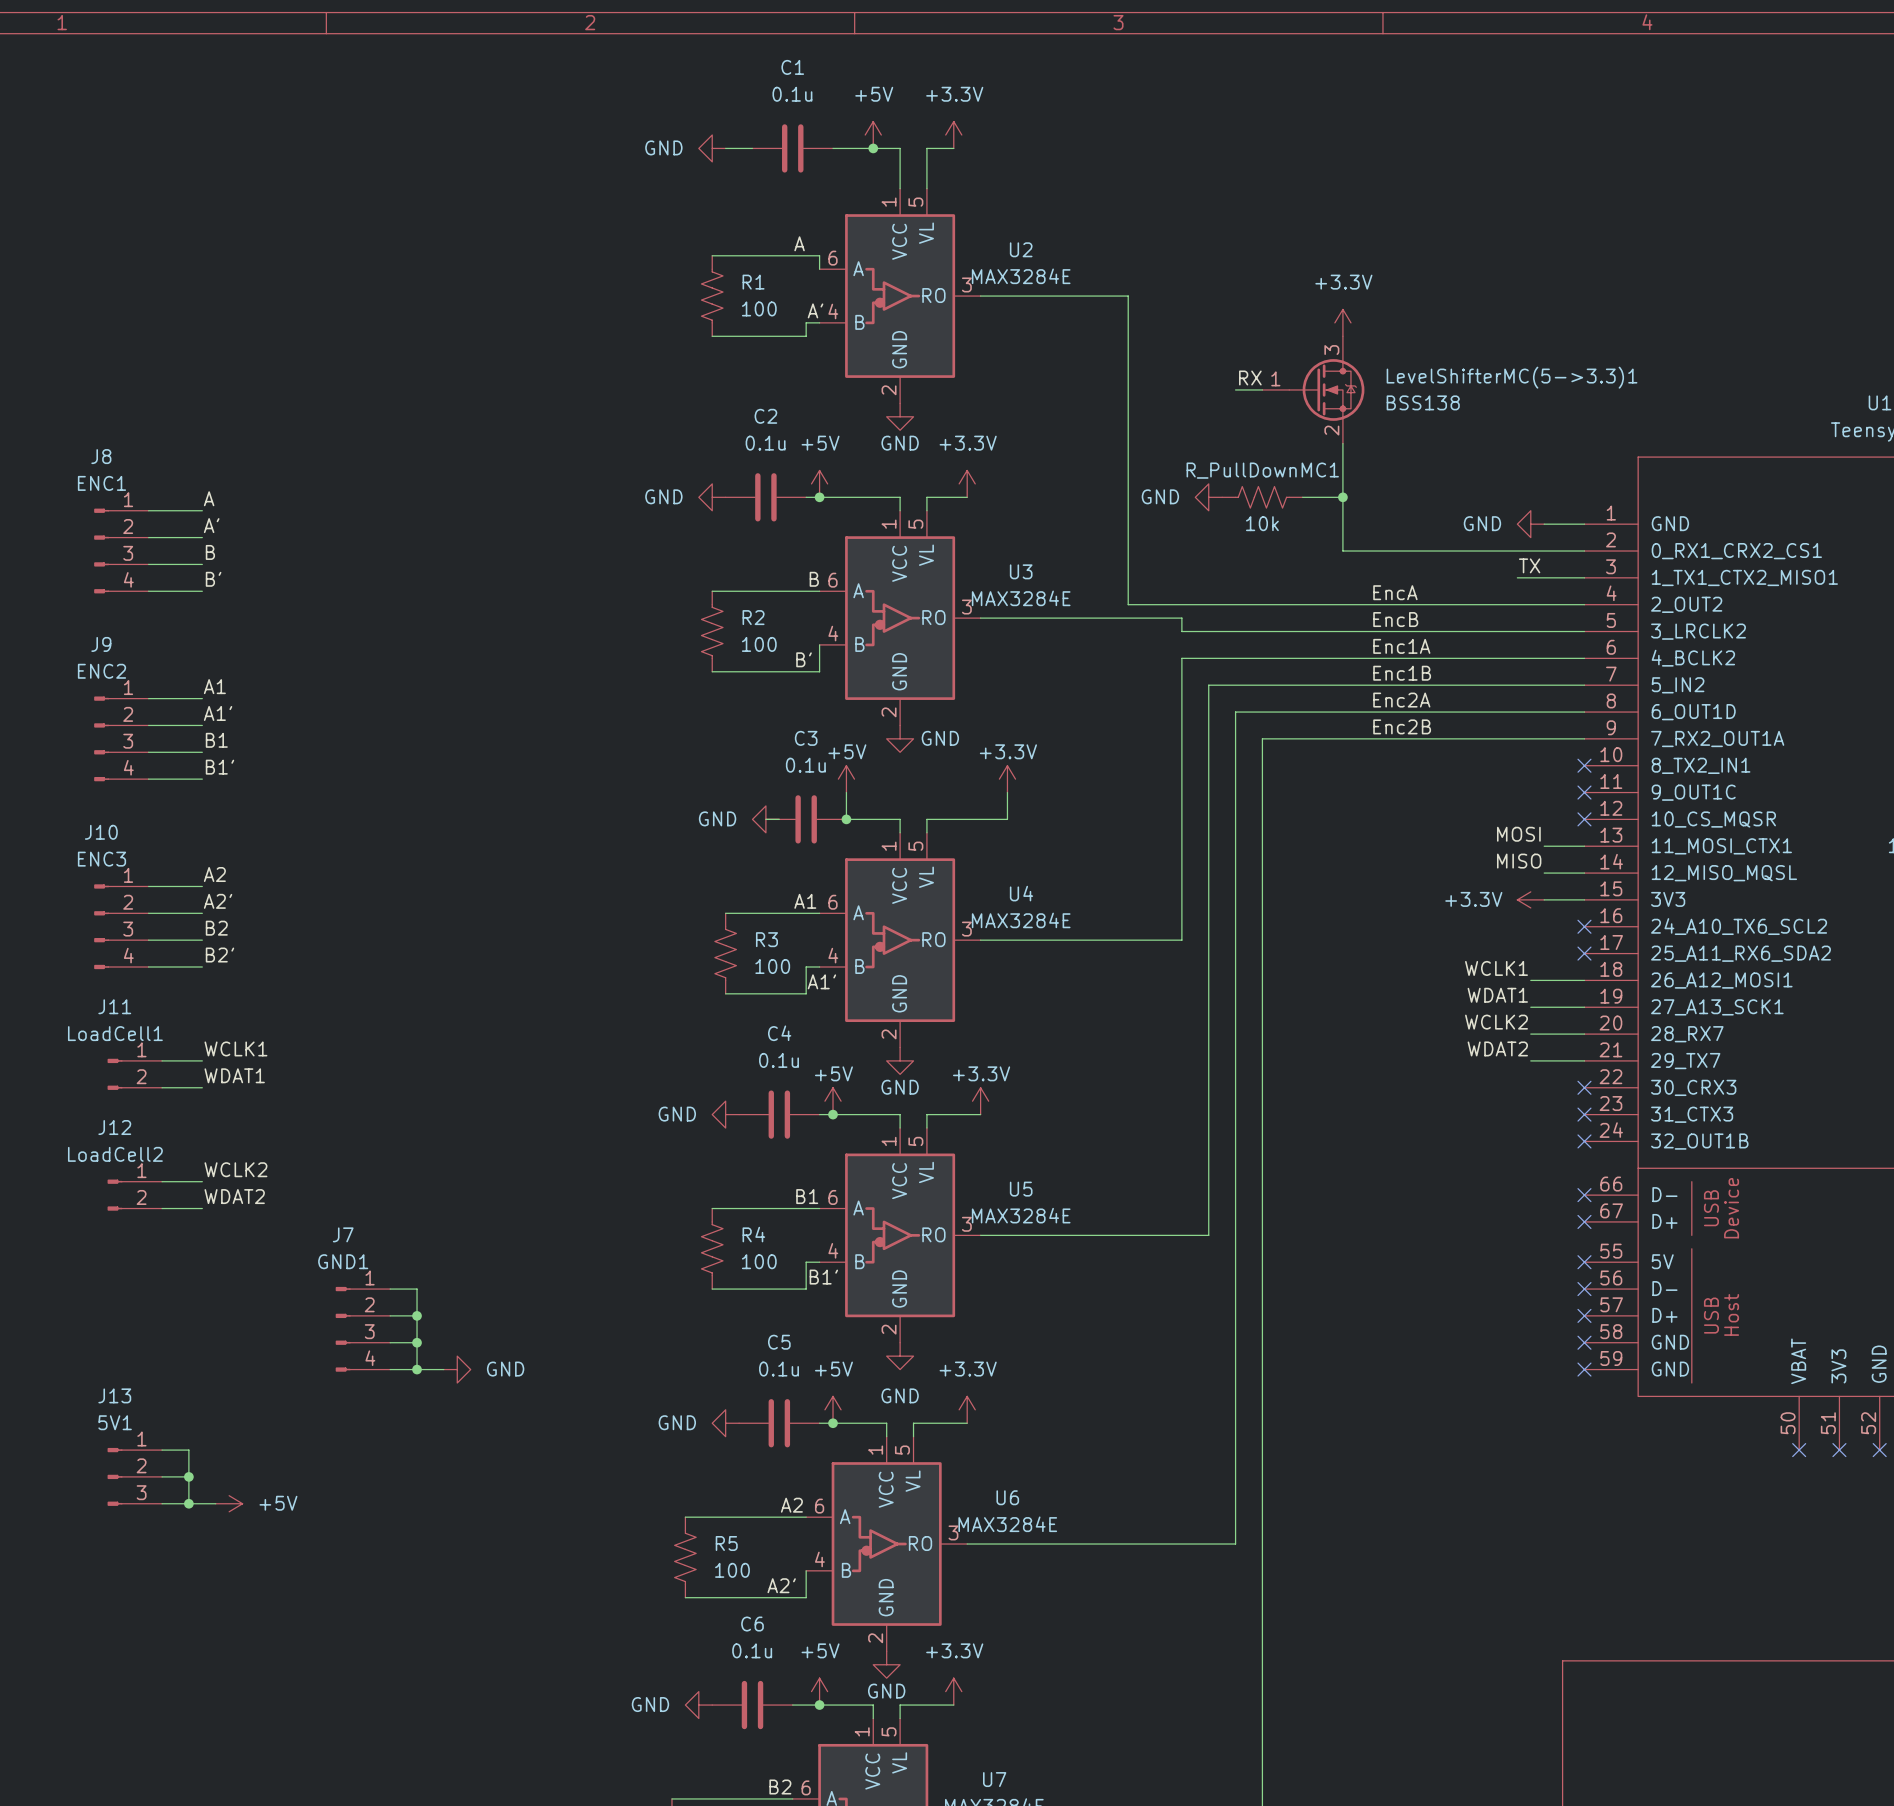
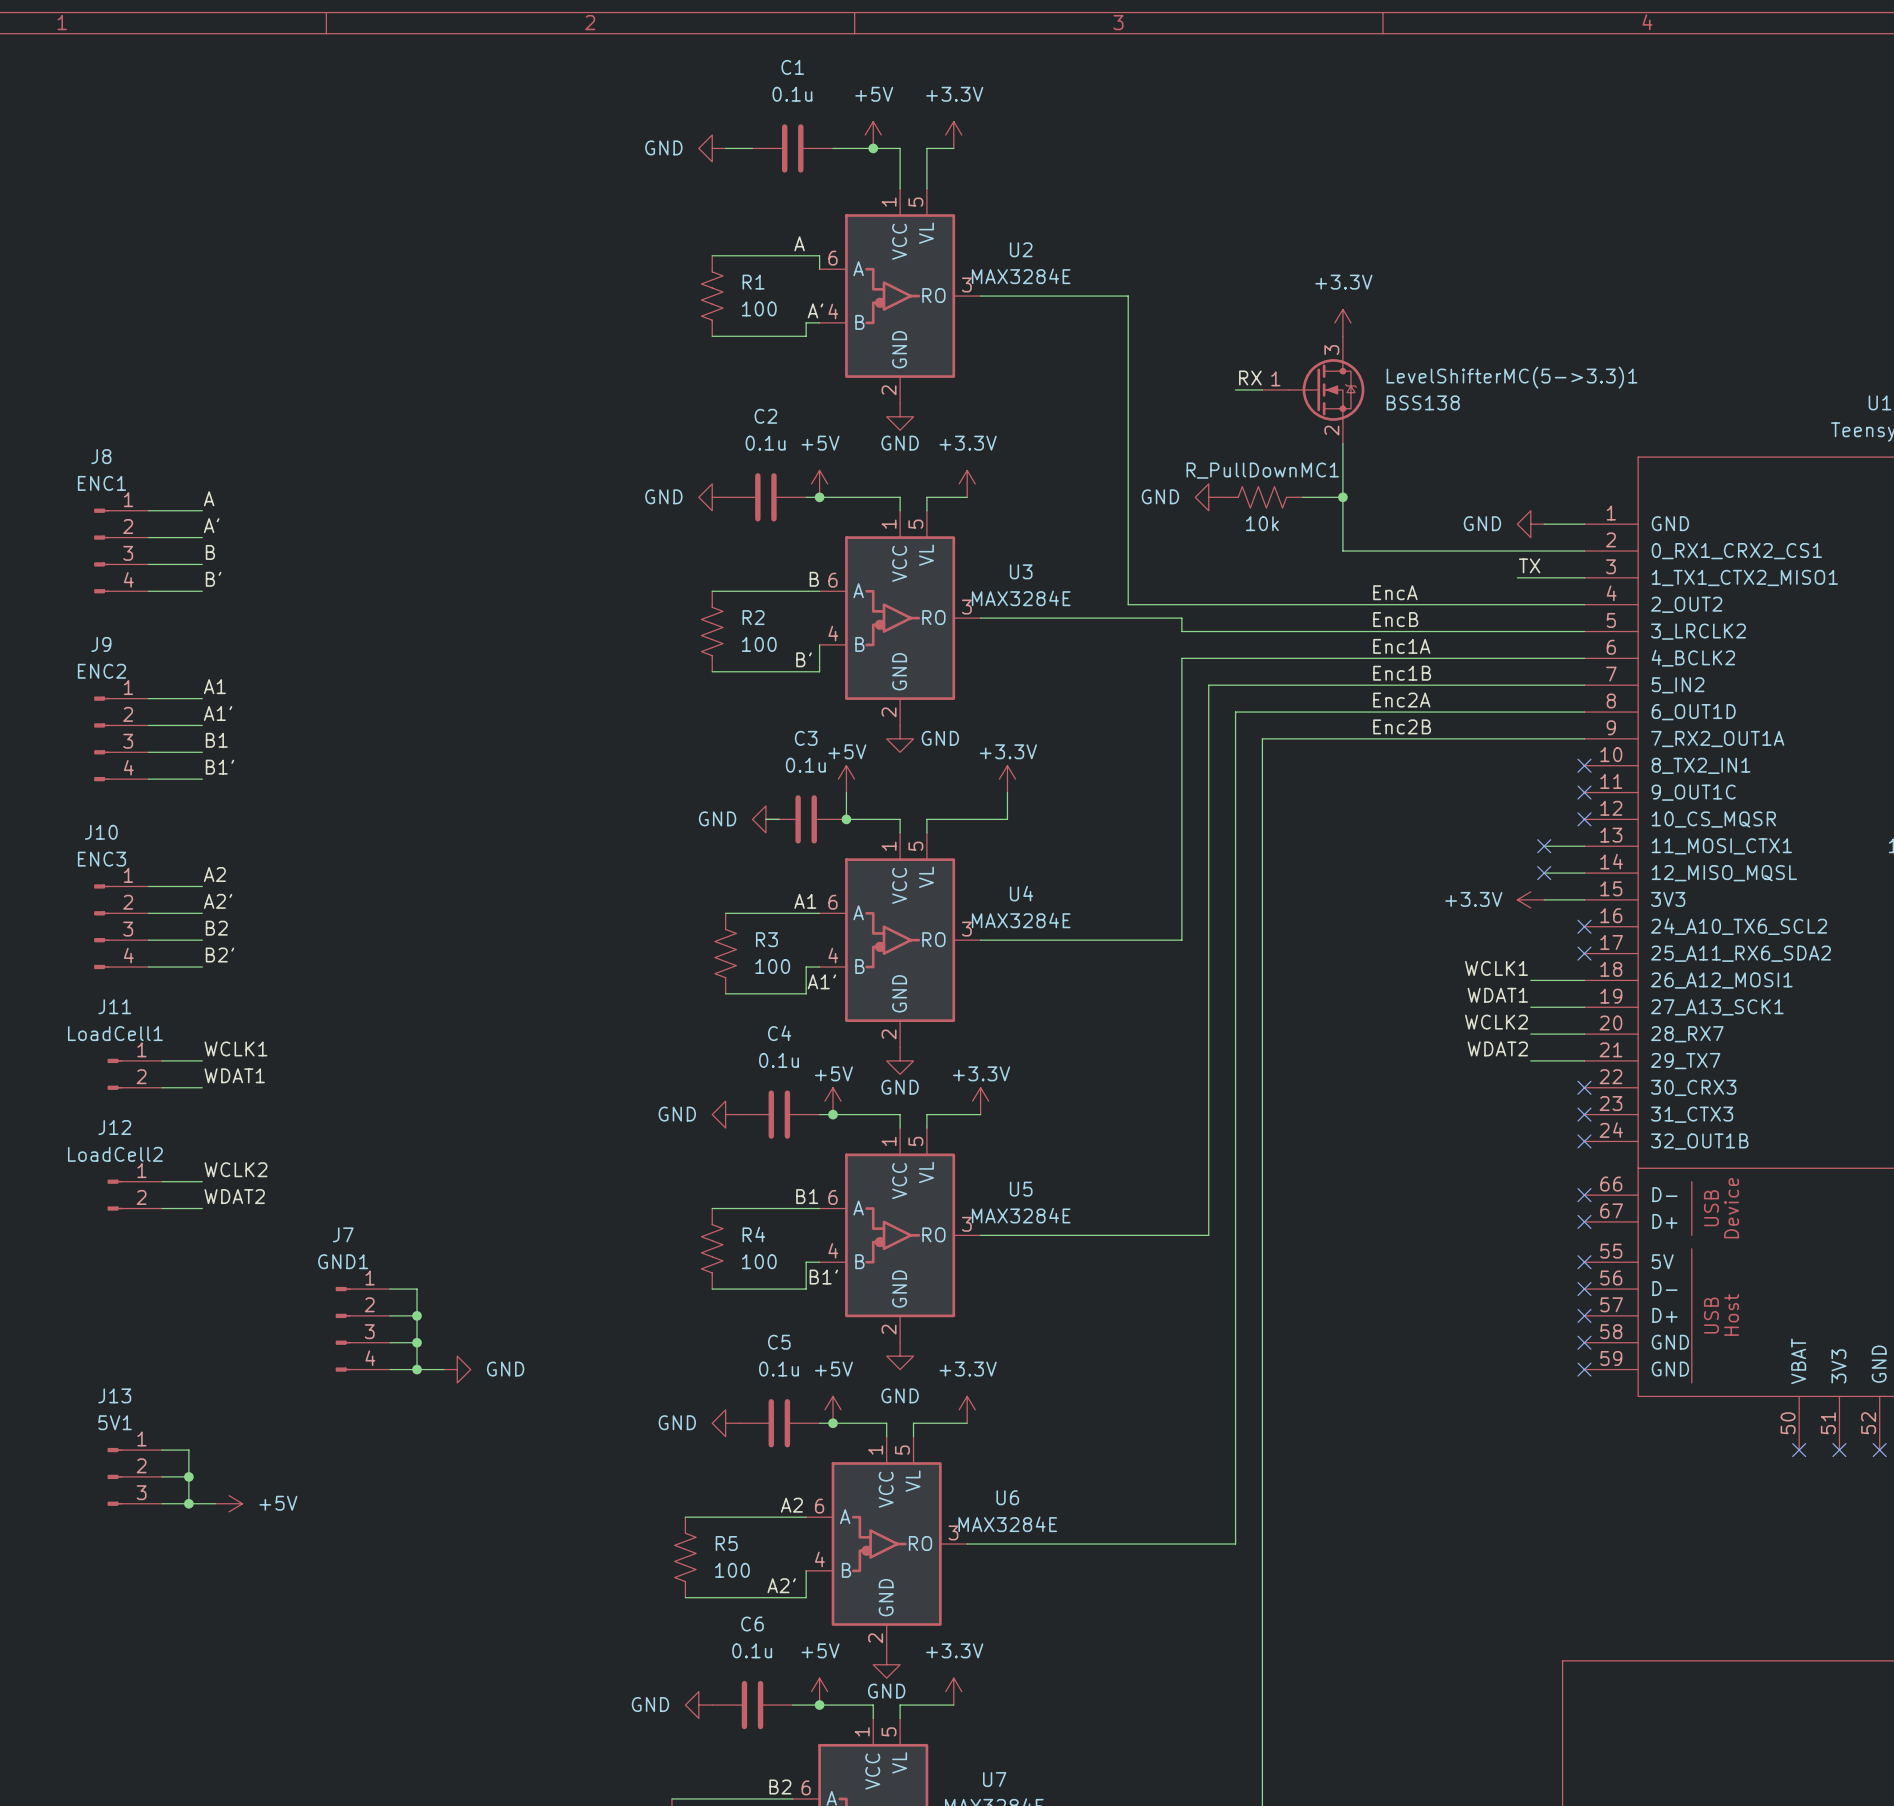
label: MOSI (1518, 834) -> none
no-connect mark: none -> (1544, 846)
label: MISO (1519, 861) -> none
no-connect mark: none -> (1544, 873)

